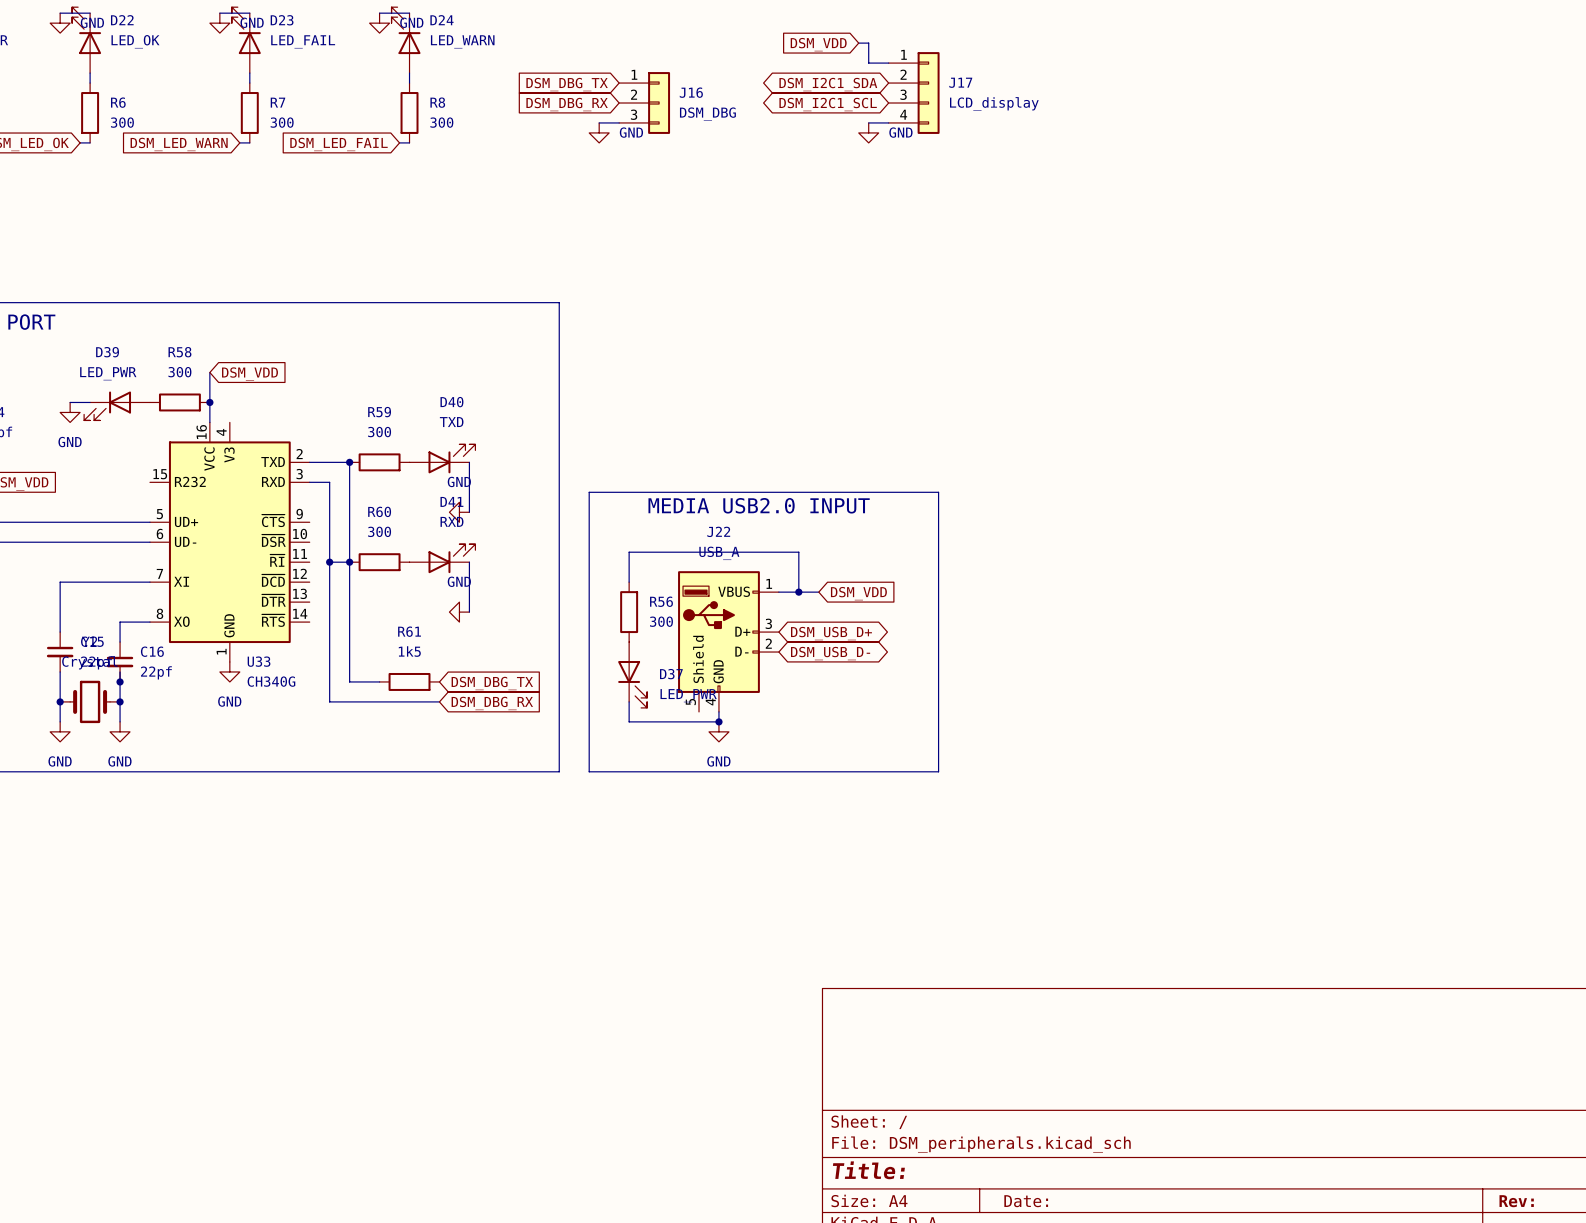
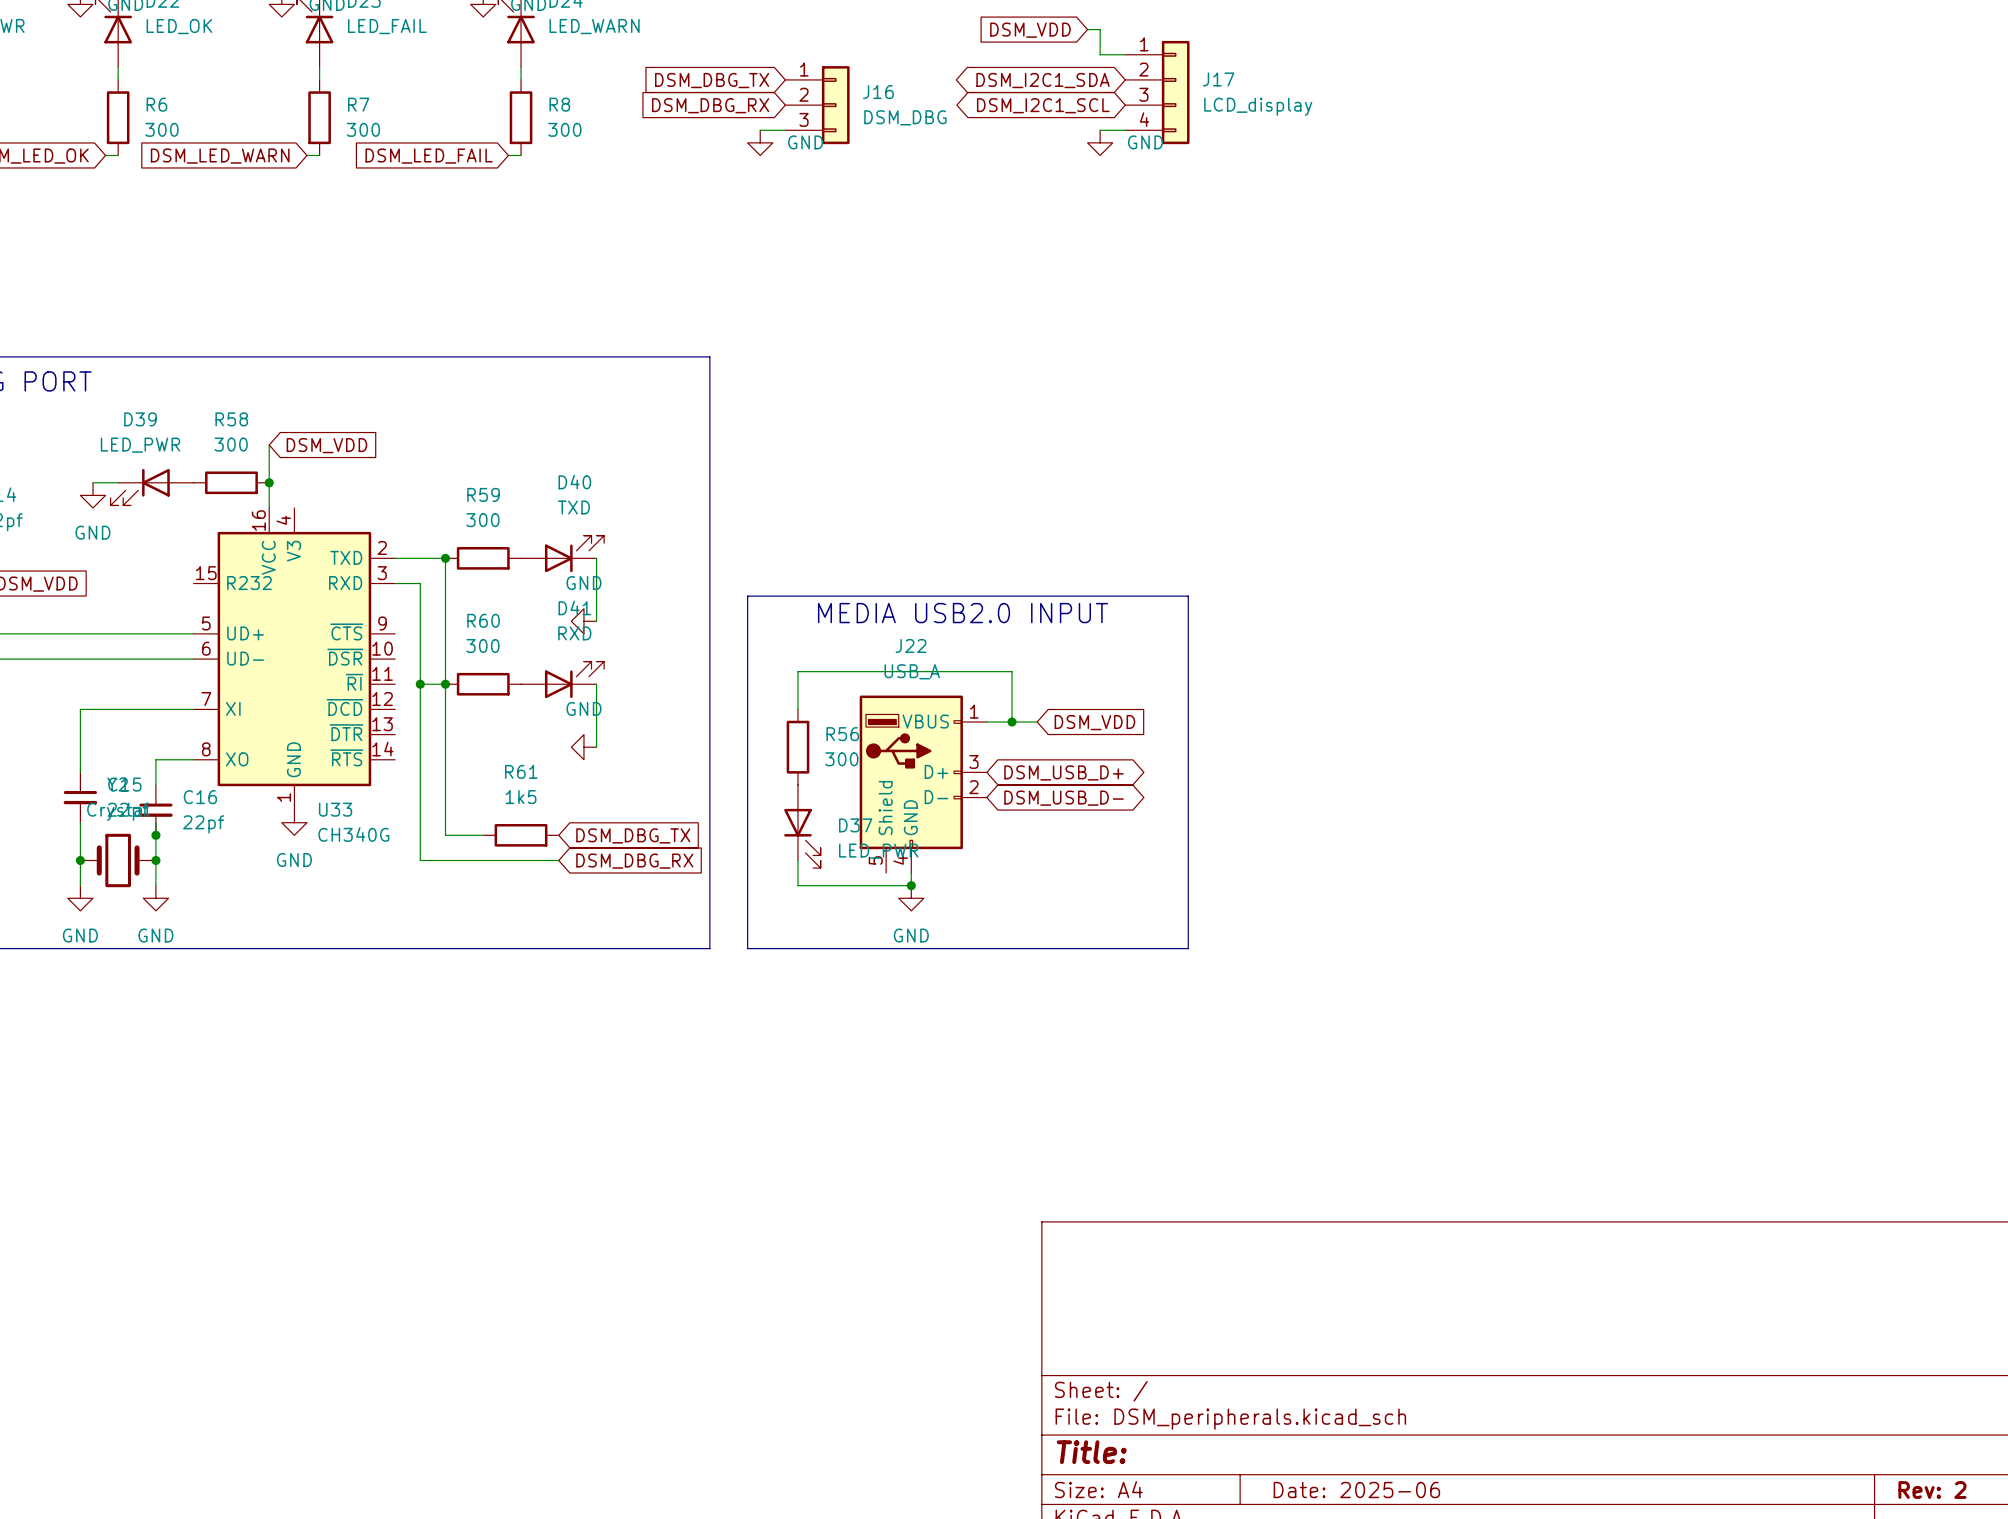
title block: Date: (1026, 1201) -> Date: 2025-06 (1356, 1490)
title block: Rev: (1516, 1201) -> Rev: 2 (1932, 1490)

